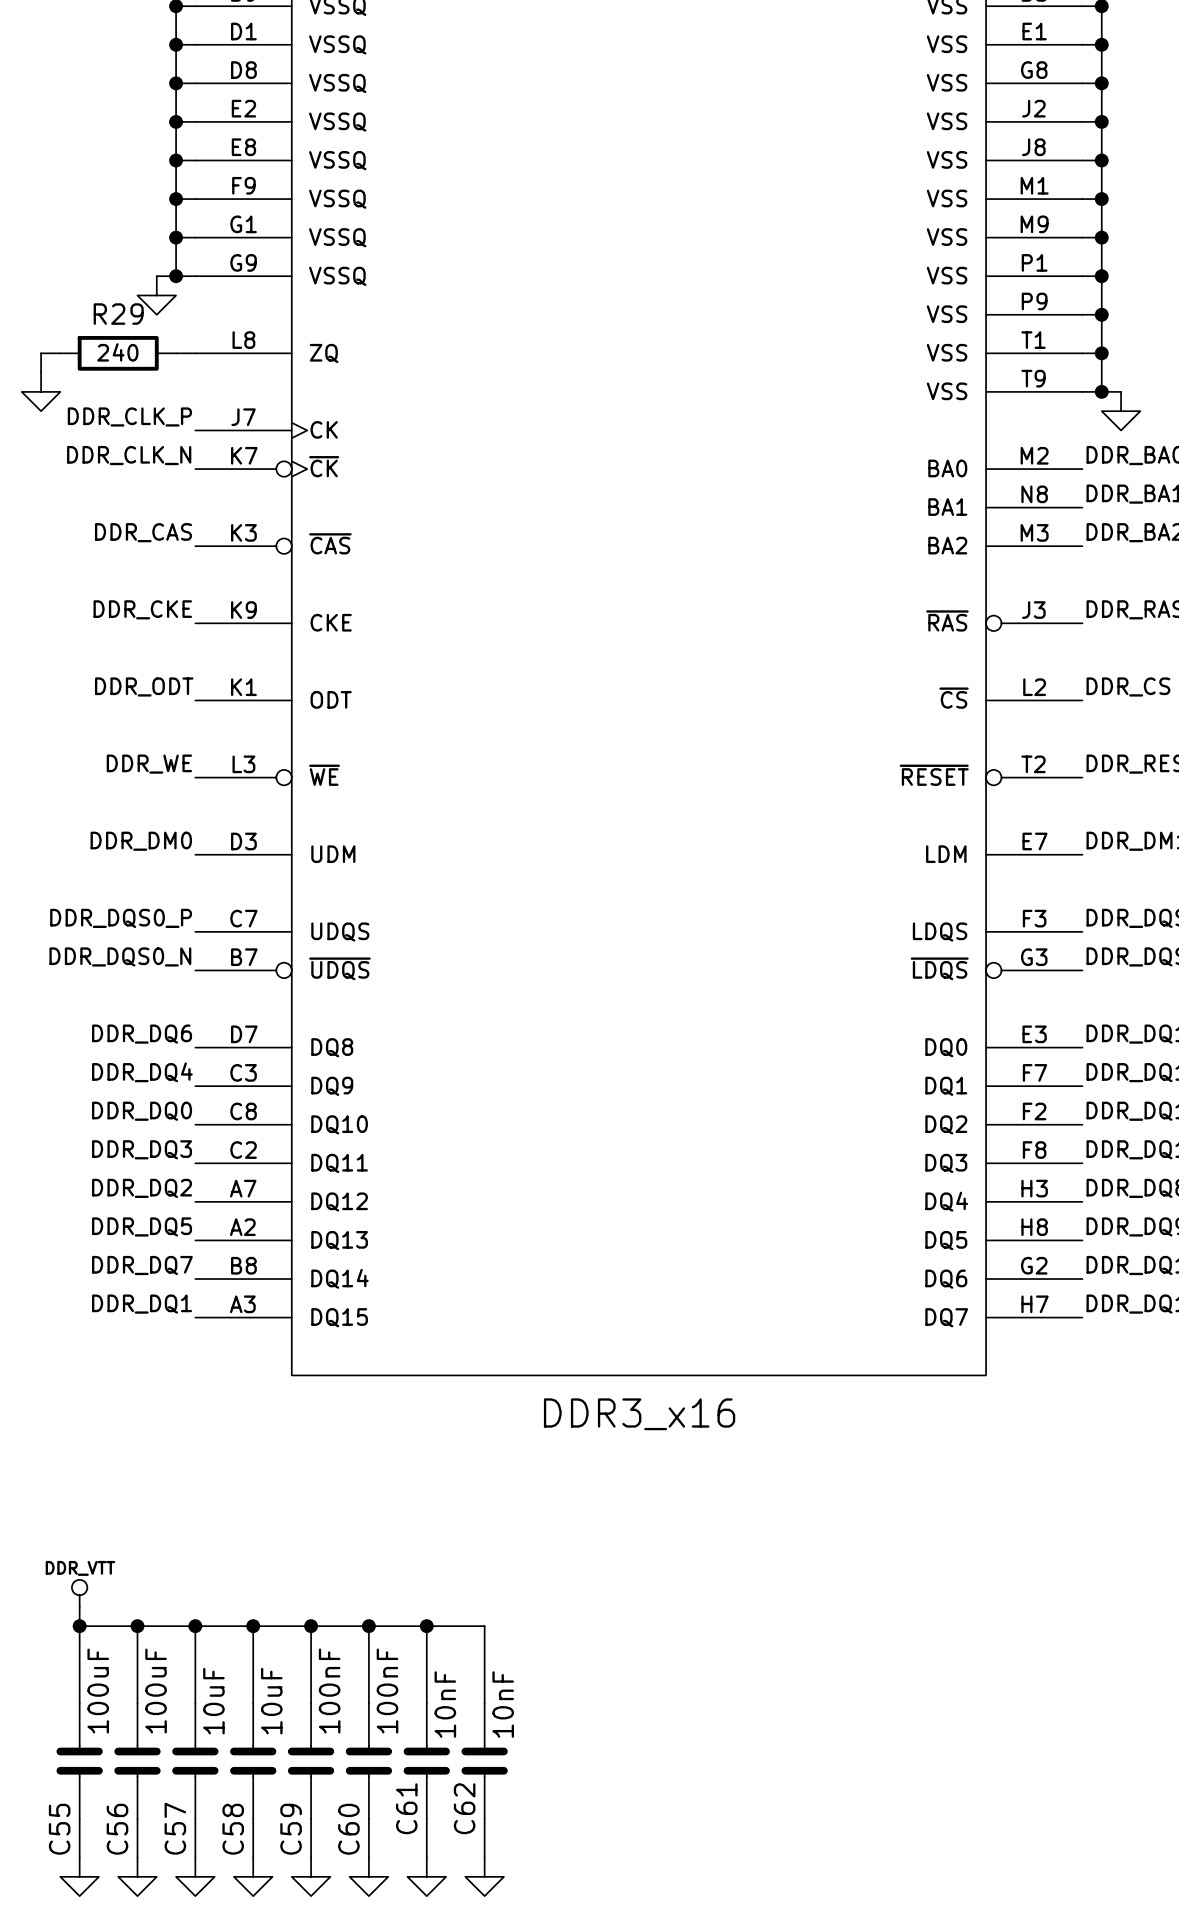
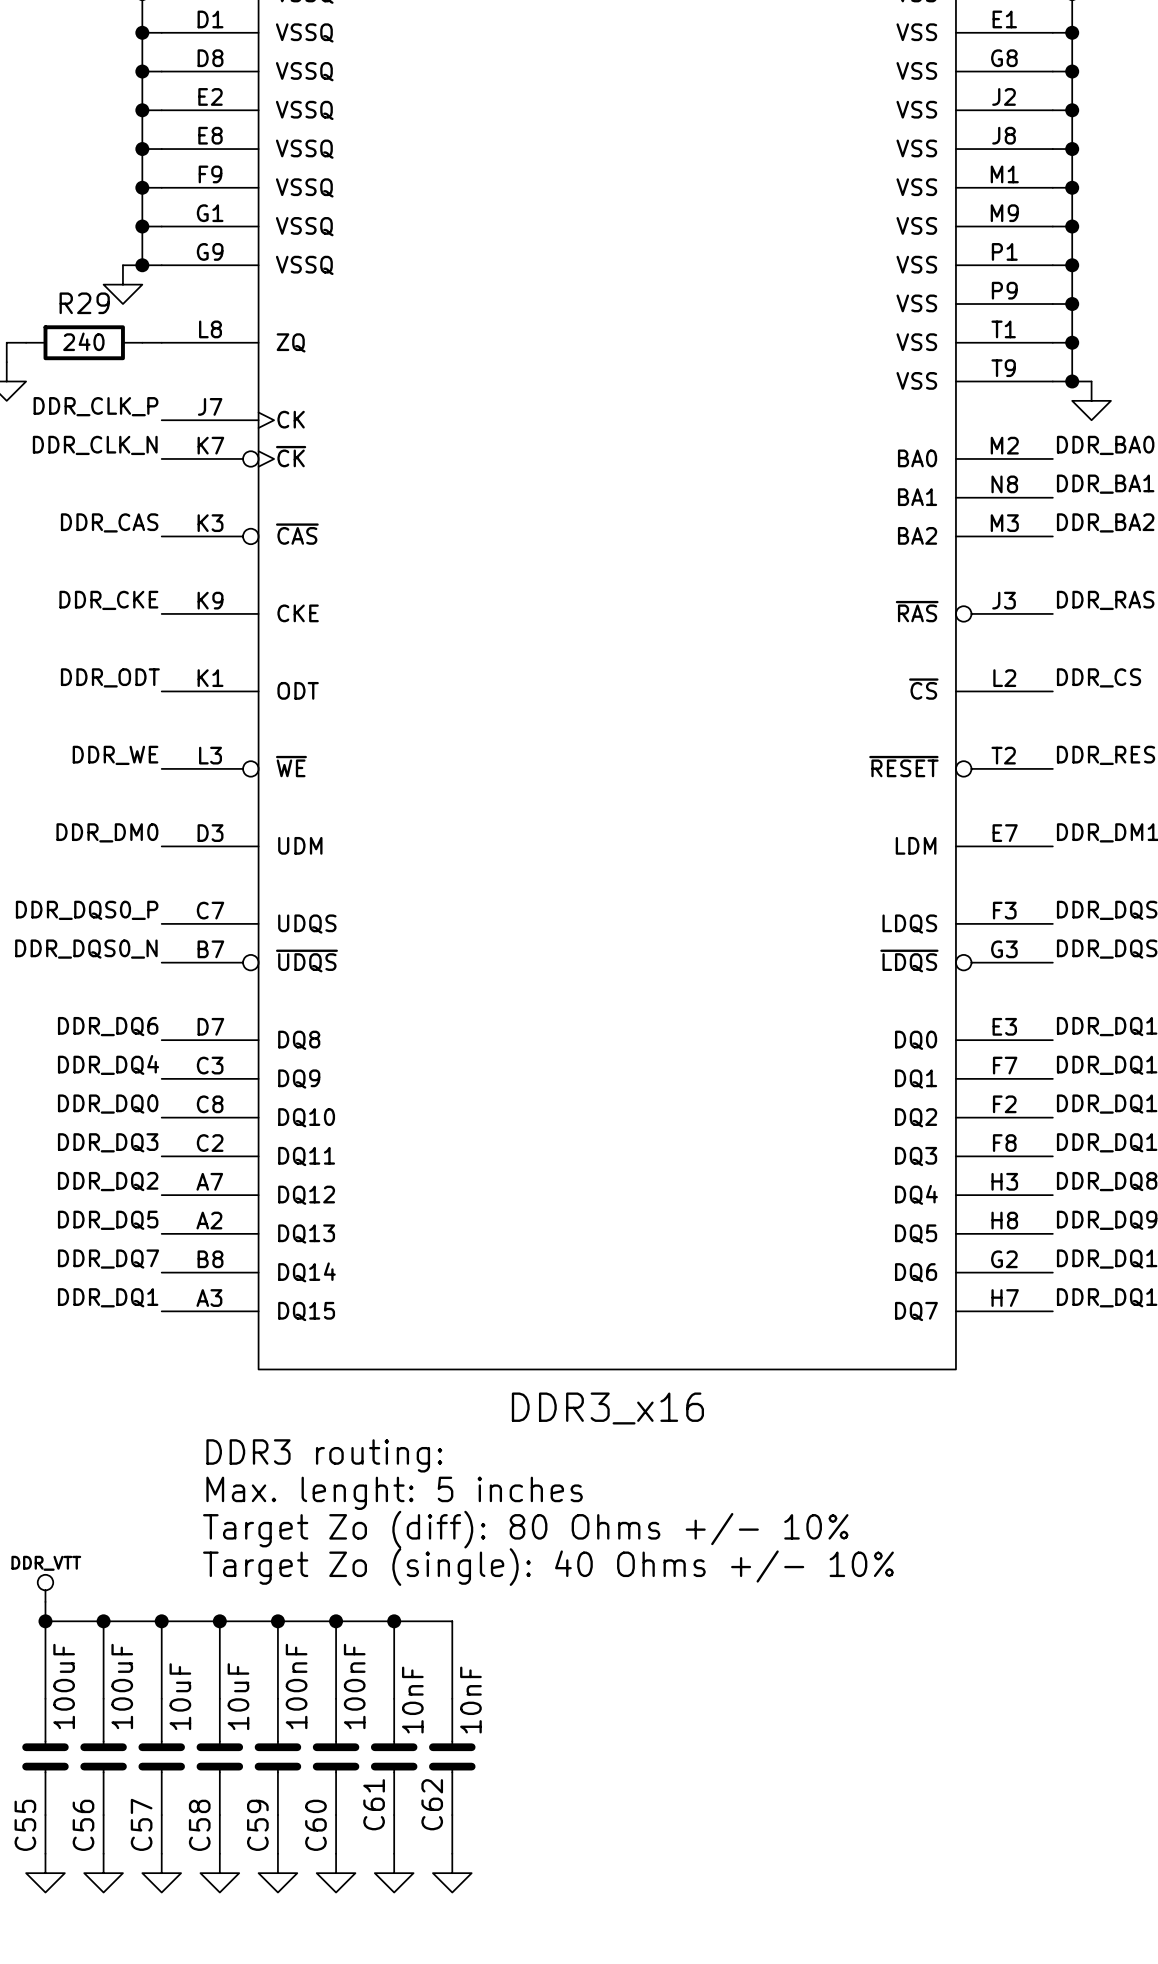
text: none -> DDR3 routing: (324, 1455)
text: none -> Max. lenght: 5 inches (394, 1493)
text: none -> Target Zo (diff): 80 Ohms +/- 10% (525, 1529)
text: none -> Target Zo (single): 40 Ohms +/- 10% (548, 1567)

